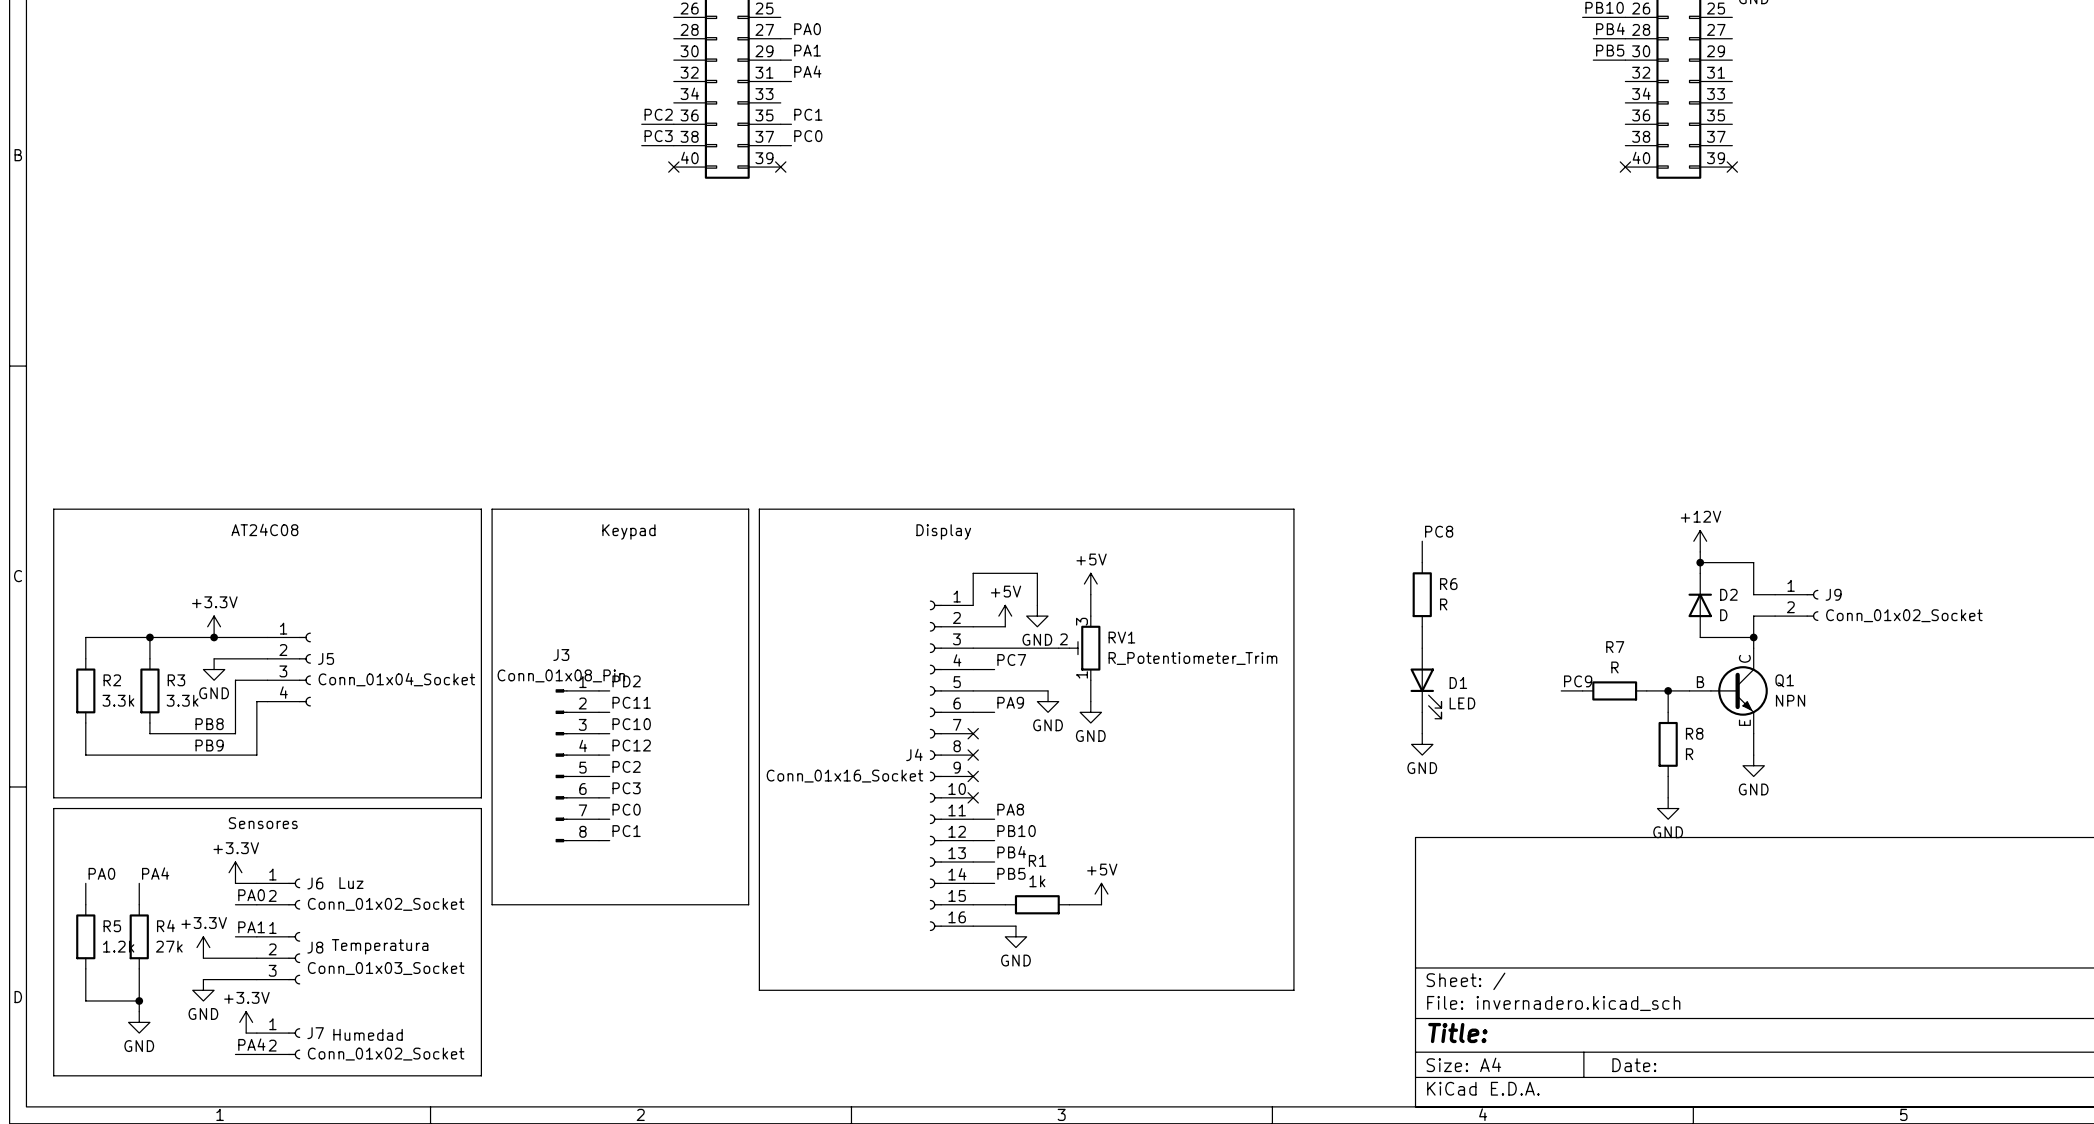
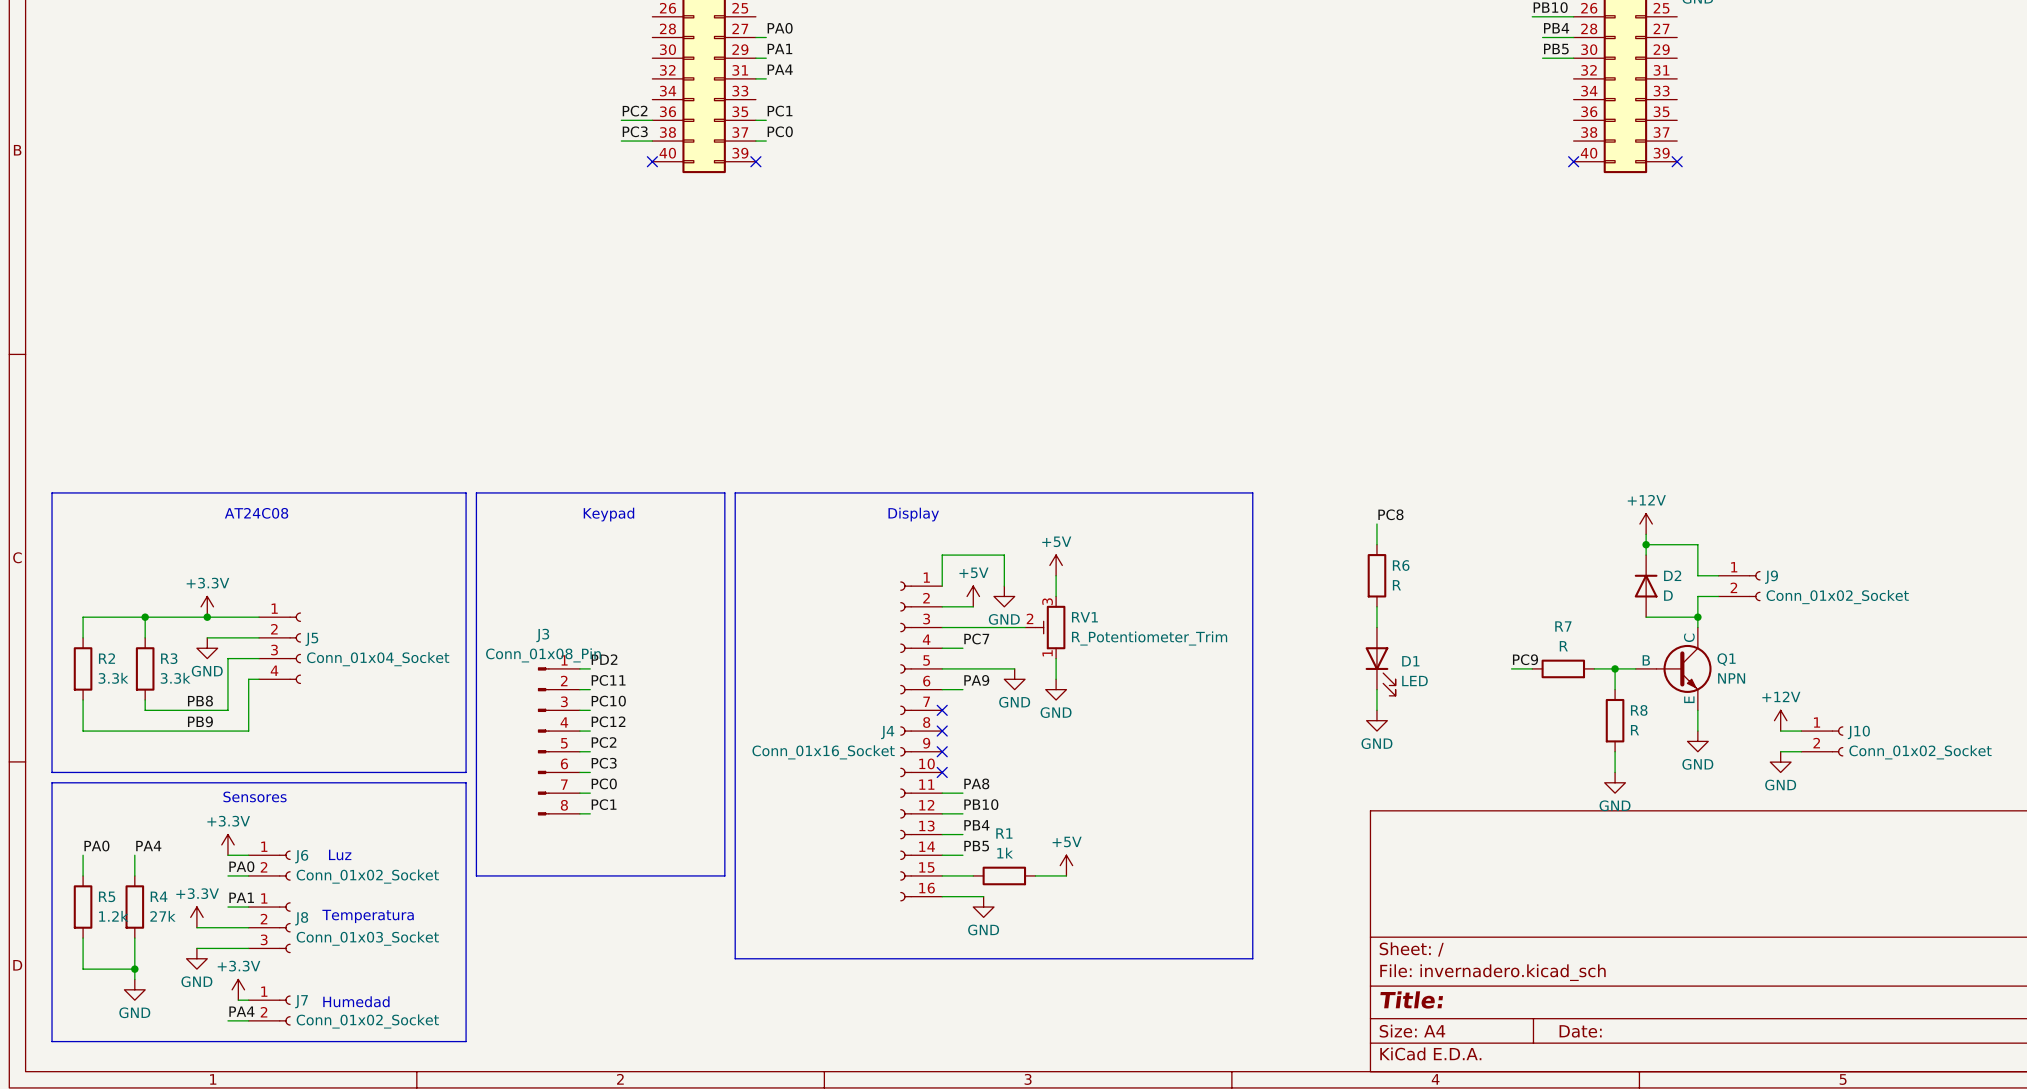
power symbol: none -> +12V (1780, 720)
wire: none -> (1780, 731) (1801, 731)
J10: none -> Conn_01x02_Socket (1822, 741)
wire: none -> (1780, 751) (1801, 751)
power symbol: none -> GND (1780, 762)

